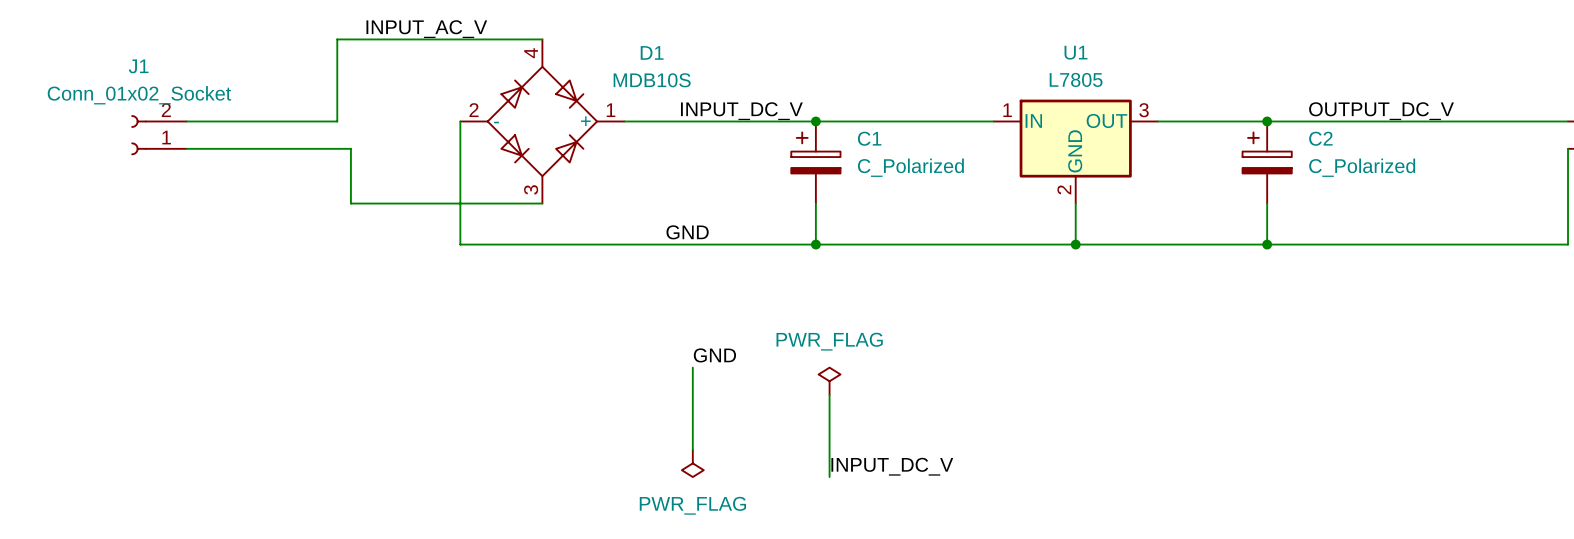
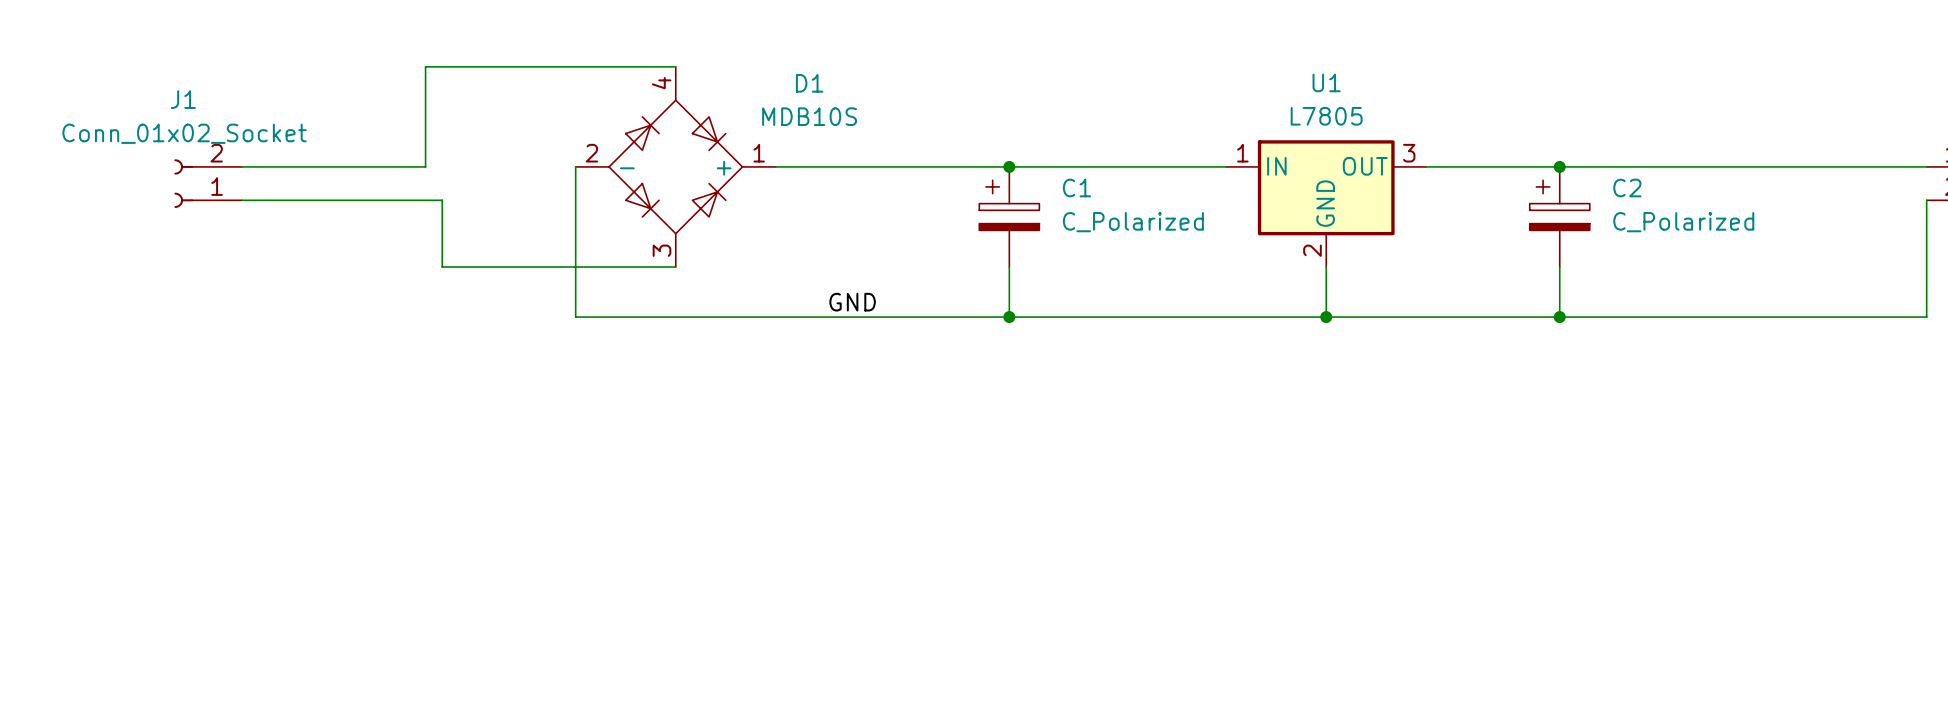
label: INPUT_AC_V (426, 29) -> none
label: INPUT_DC_V (741, 111) -> none
label: OUTPUT_DC_V (1381, 111) -> none
label: GND (714, 355) -> none
wire: (692, 367) (692, 449) -> none
power symbol: PWR_FLAG (829, 381) -> none
wire: (829, 394) (829, 477) -> none
power symbol: PWR_FLAG (692, 463) -> none
label: INPUT_DC_V (892, 466) -> none

